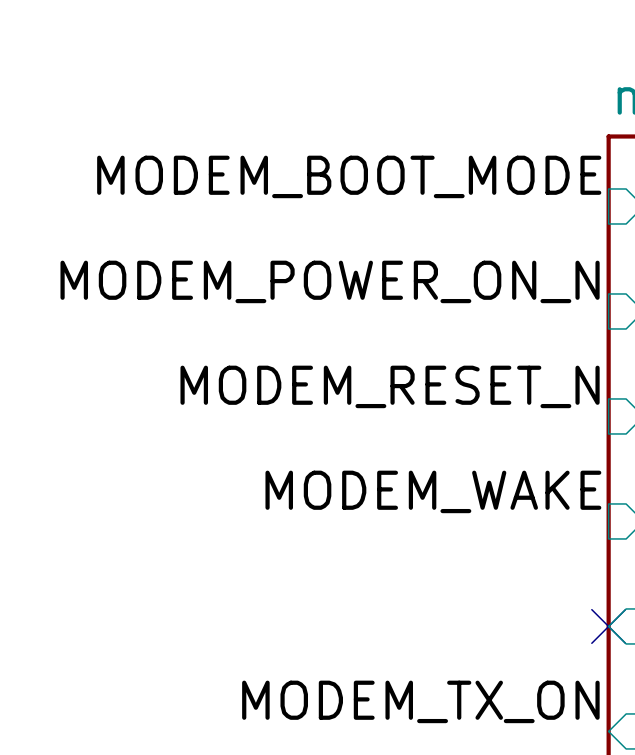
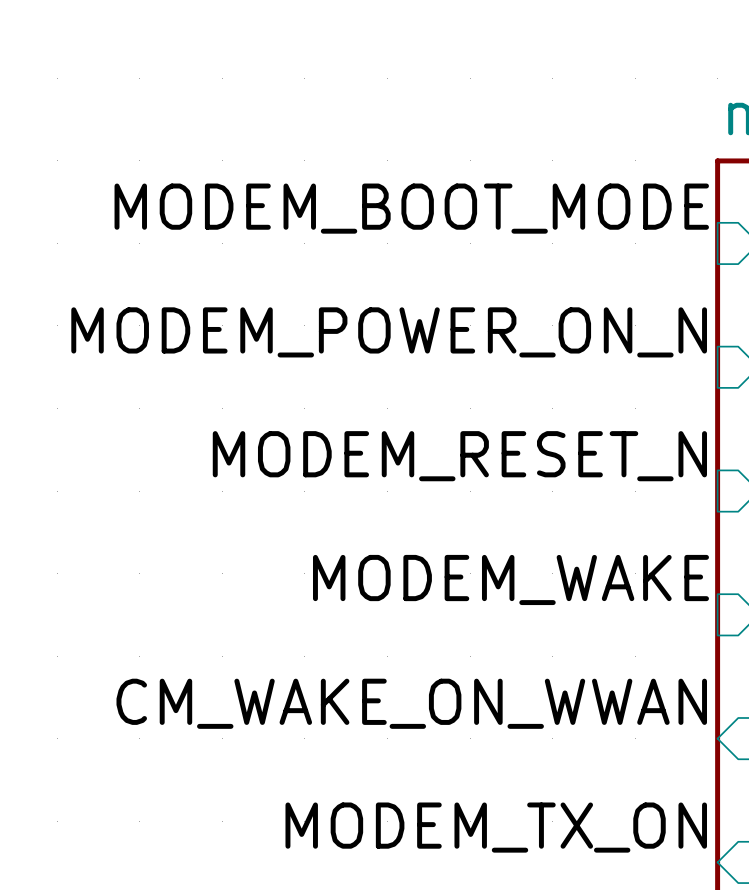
label: none -> CM_WAKE_ON_WWAN (411, 703)
no-connect mark: (608, 626) -> none

